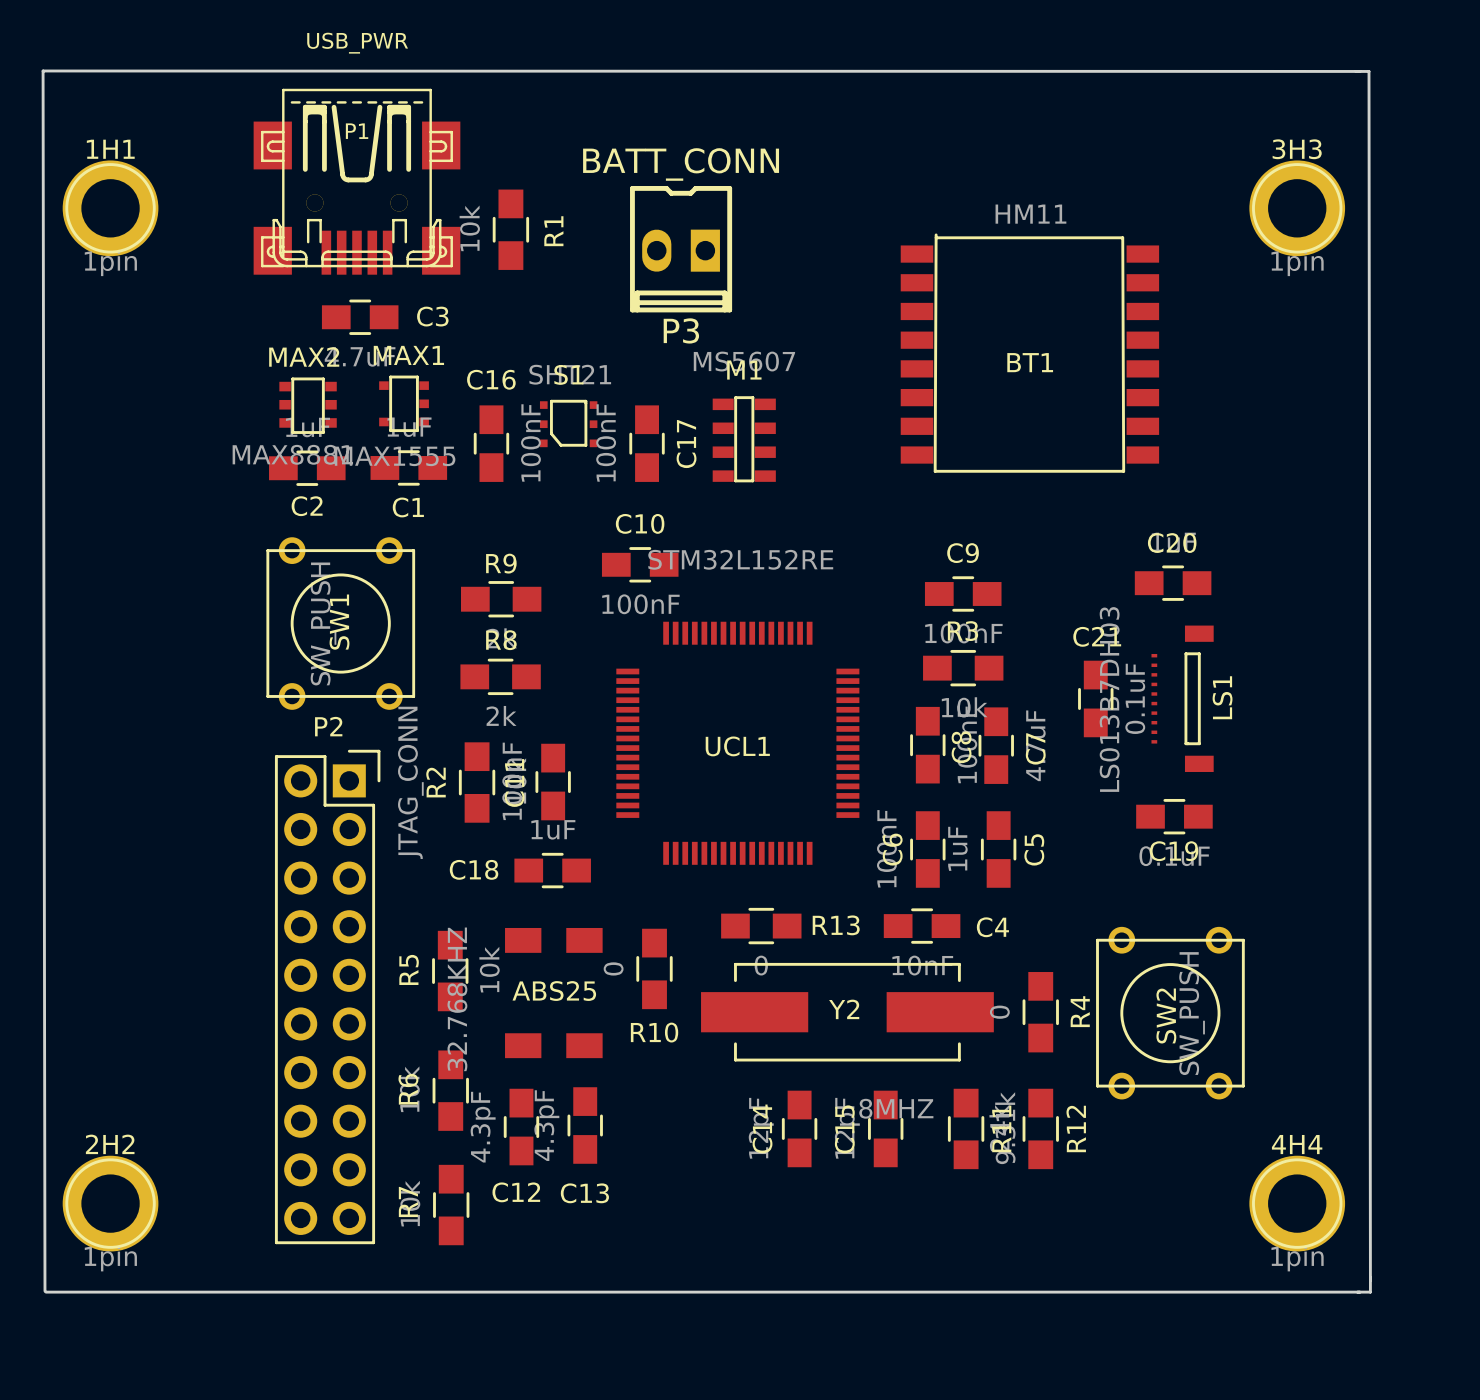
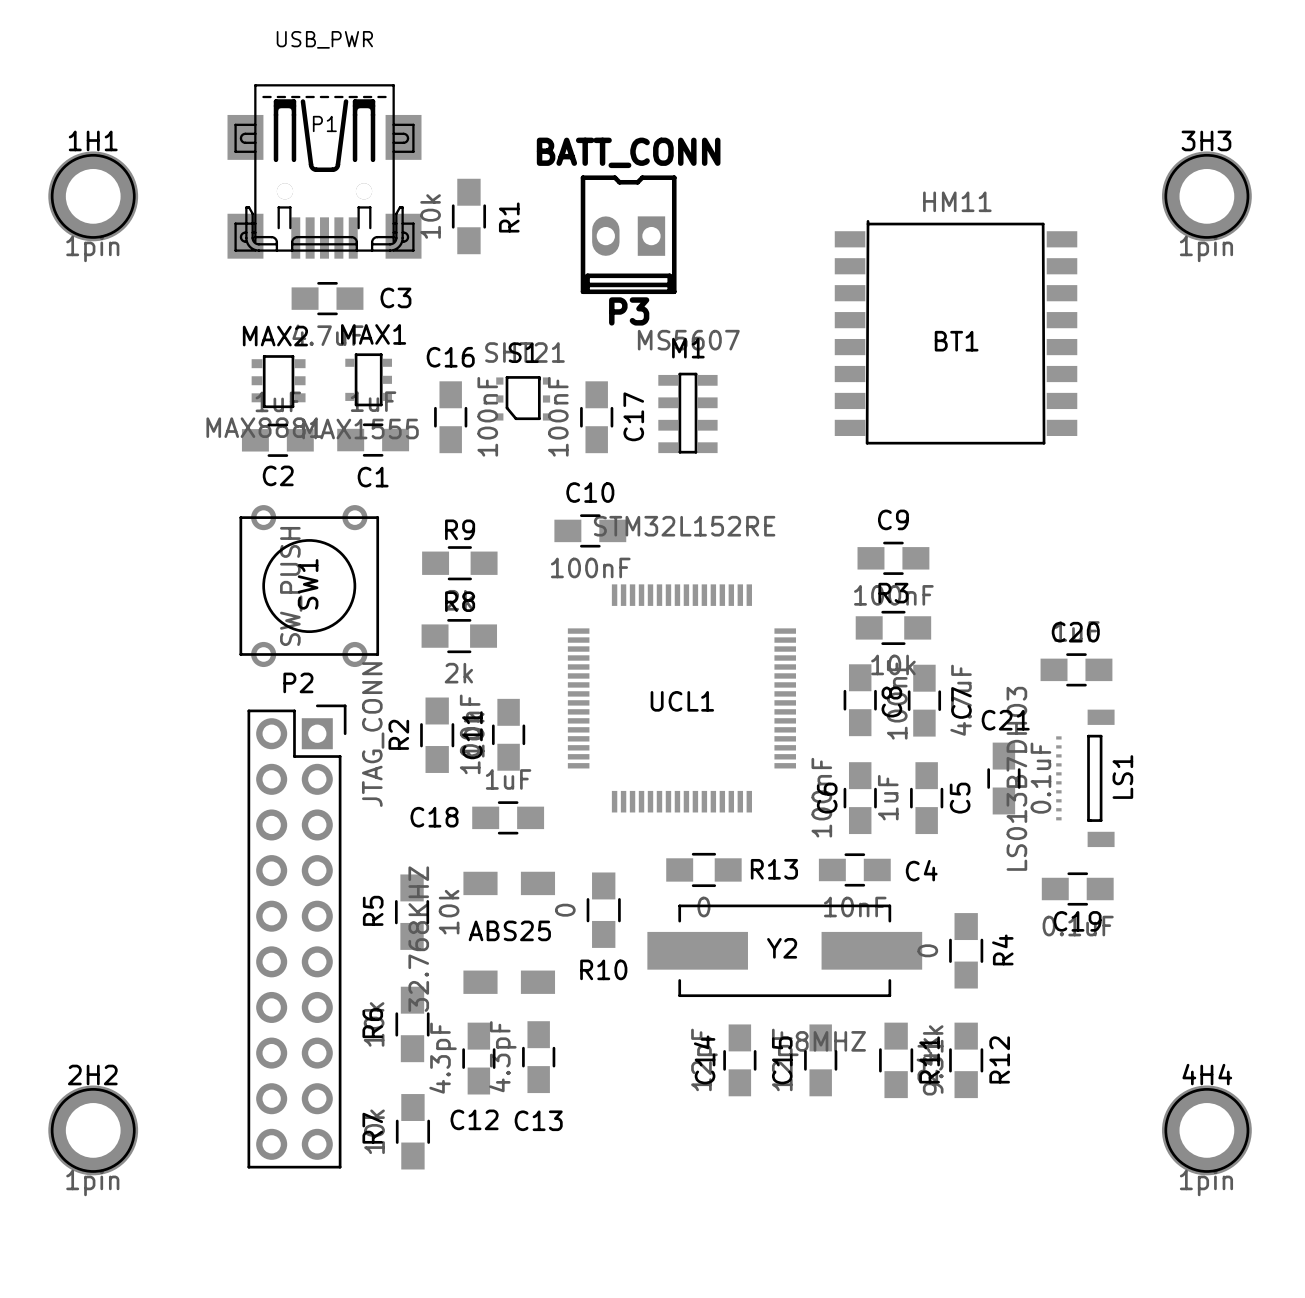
board edge: (1356, 71) (1369, 71) (1370, 1280) -> none
board edge: (1359, 71) (43, 70) (44, 1291) -> none
C20 position: (1173, 583) -> (1076, 669)
C21 position: (1095, 698) -> (1003, 778)
LS1 position: (1182, 698) -> (1085, 778)
C19 position: (1174, 816) -> (1077, 889)
SW2: SW_PUSH (1170, 1013) -> none
board edge: (1370, 1277) (1370, 1292) (45, 1292) -> none

